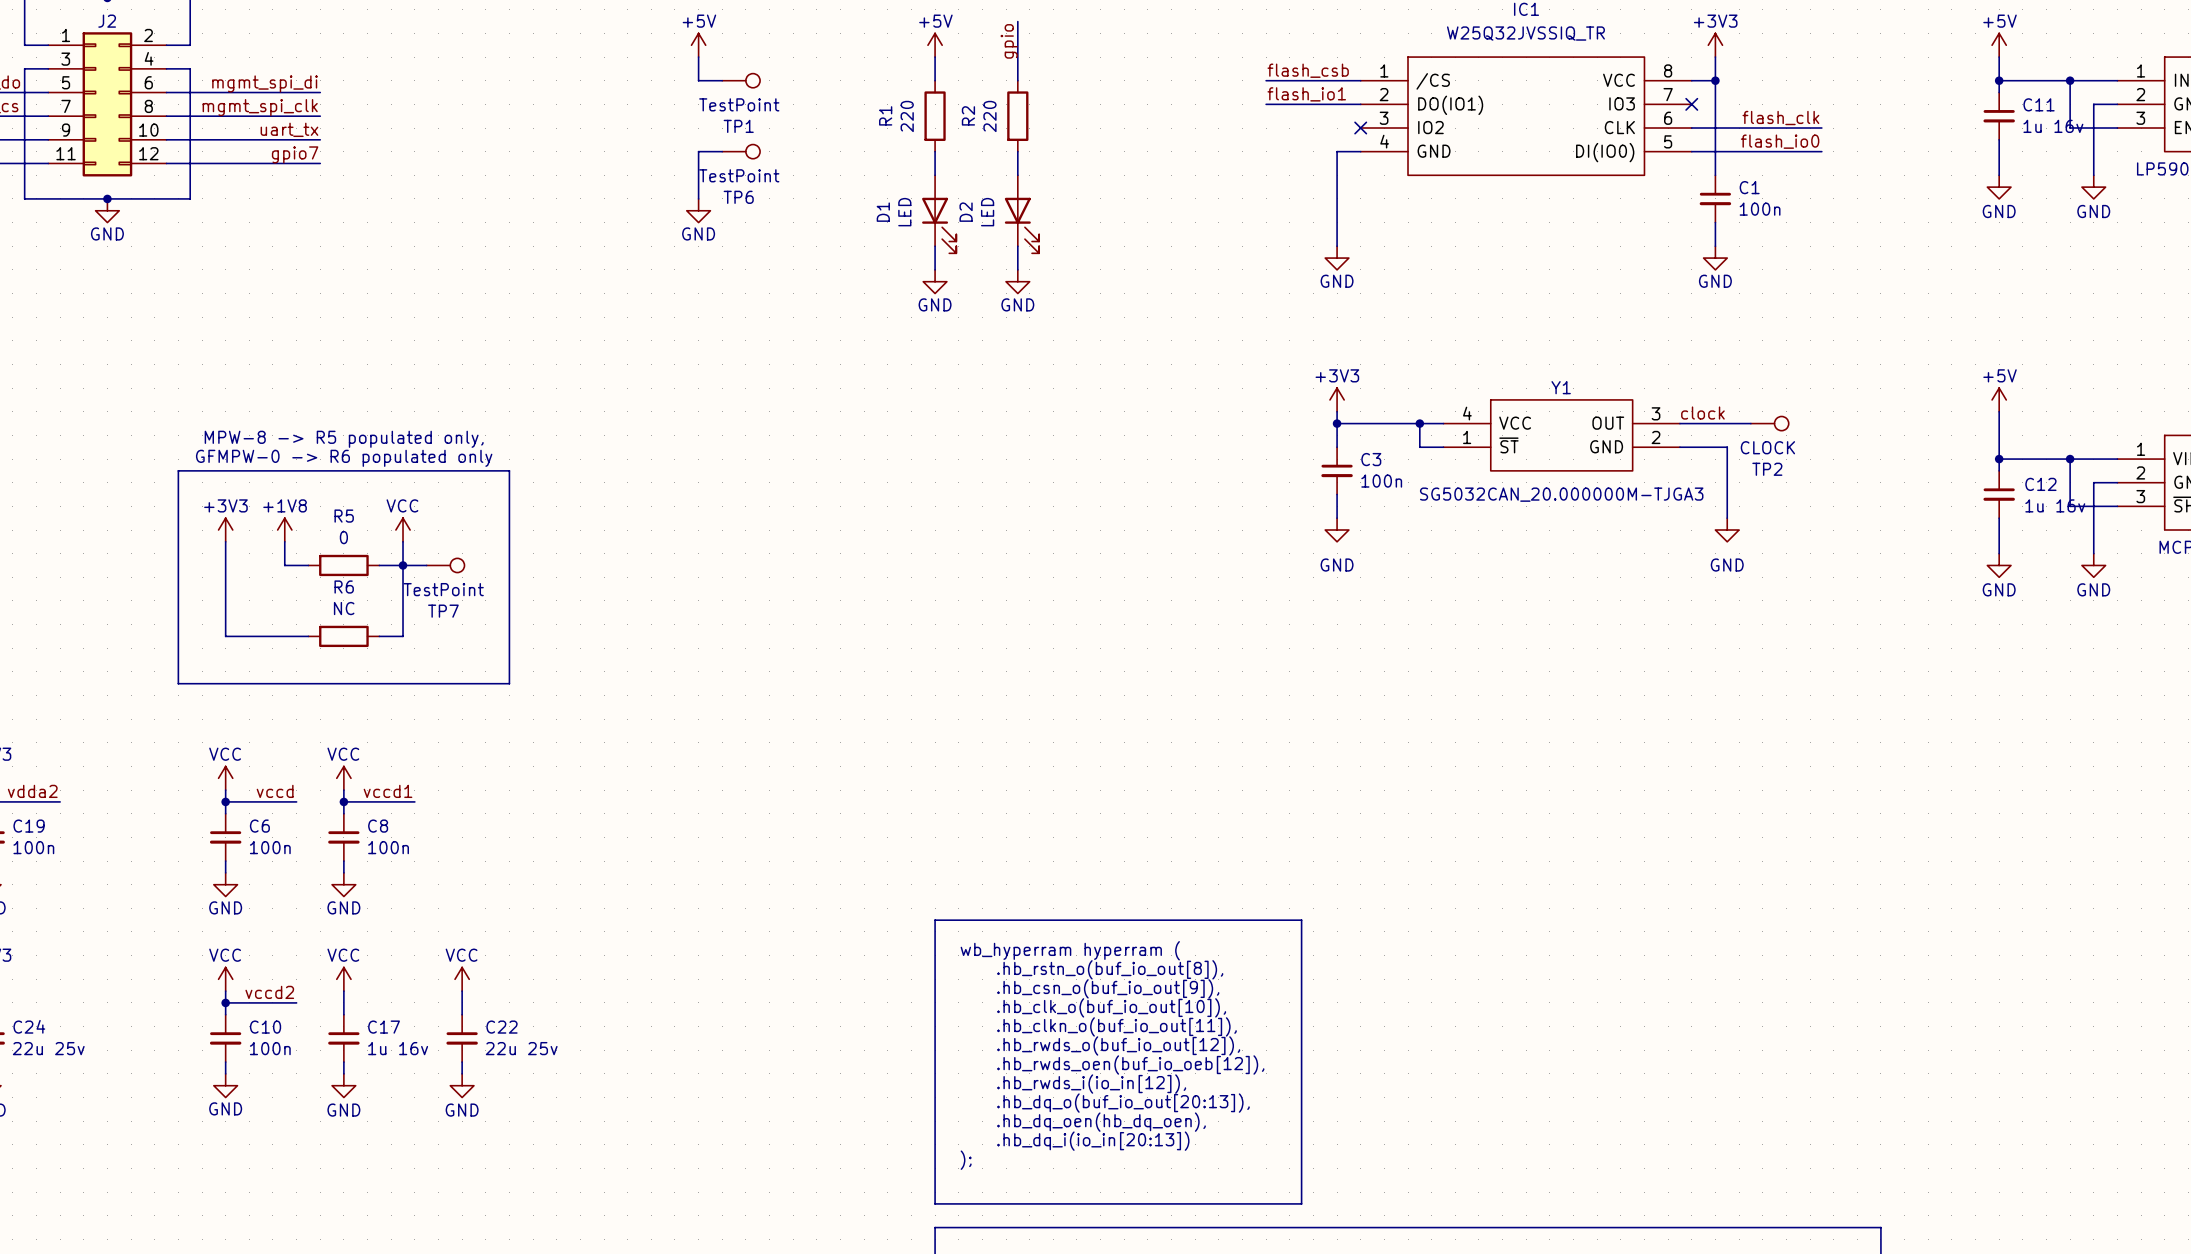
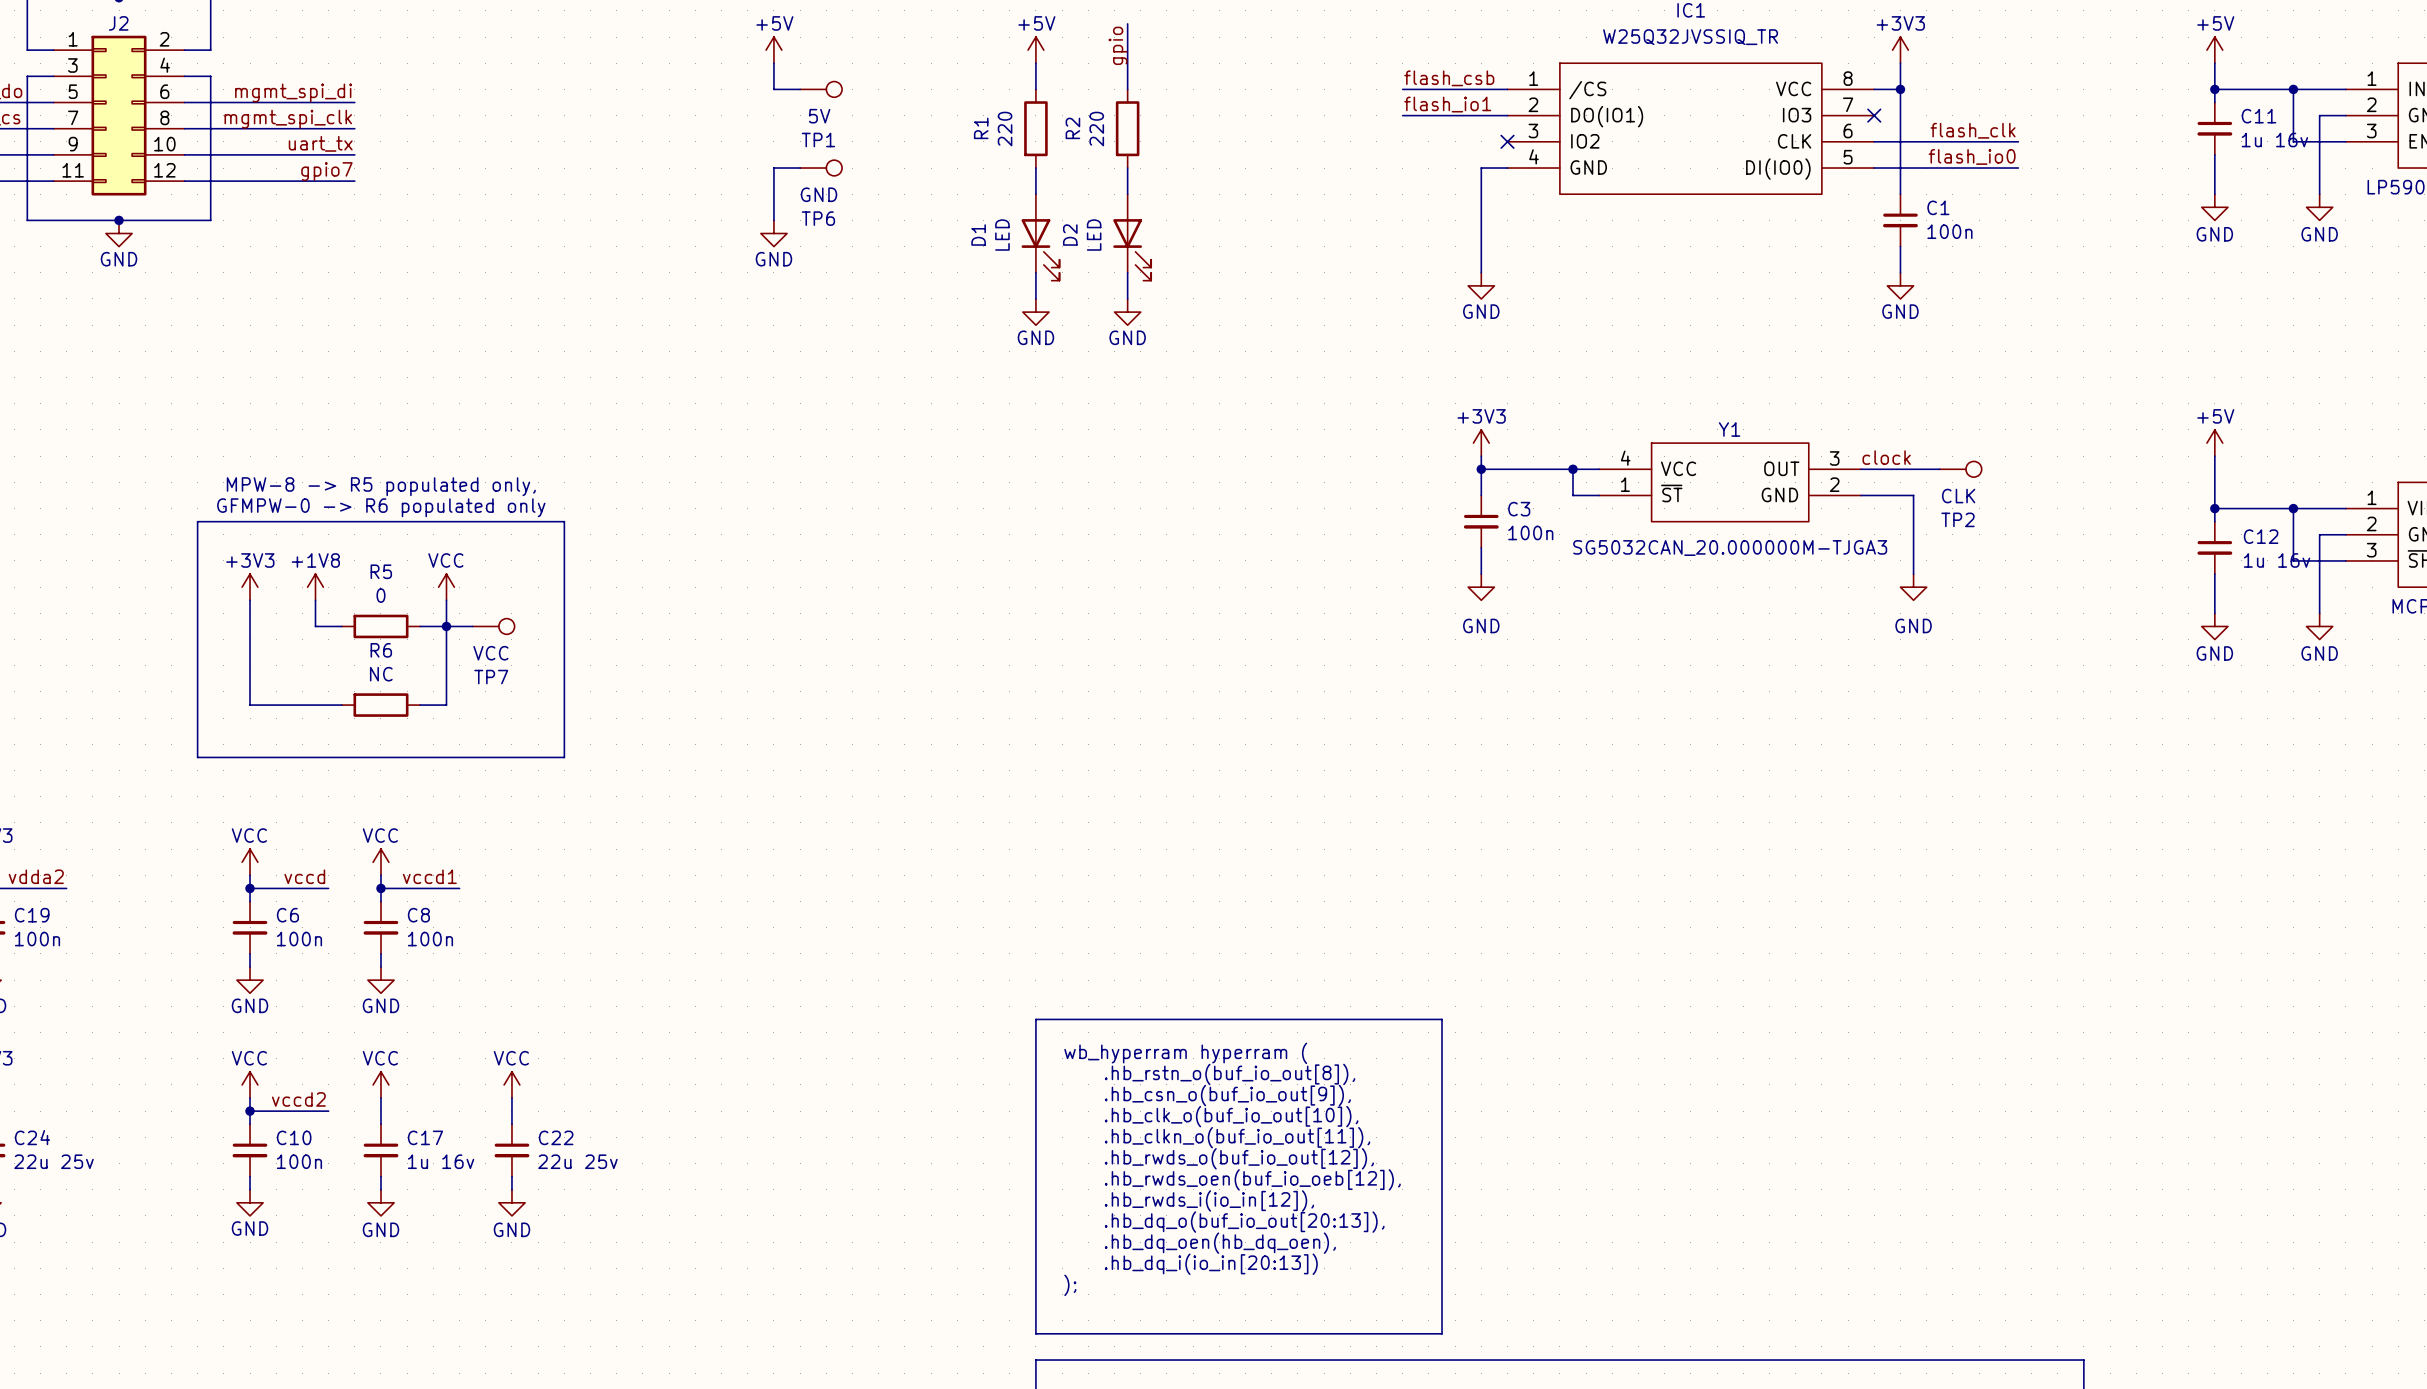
TP1 value: TestPoint (739, 104) -> 5V (819, 116)
TP6 value: TestPoint (739, 175) -> GND (819, 194)
TP2 value: CLOCK (1767, 447) -> CLK (1958, 496)
TP7 value: TestPoint (443, 589) -> VCC (490, 653)

